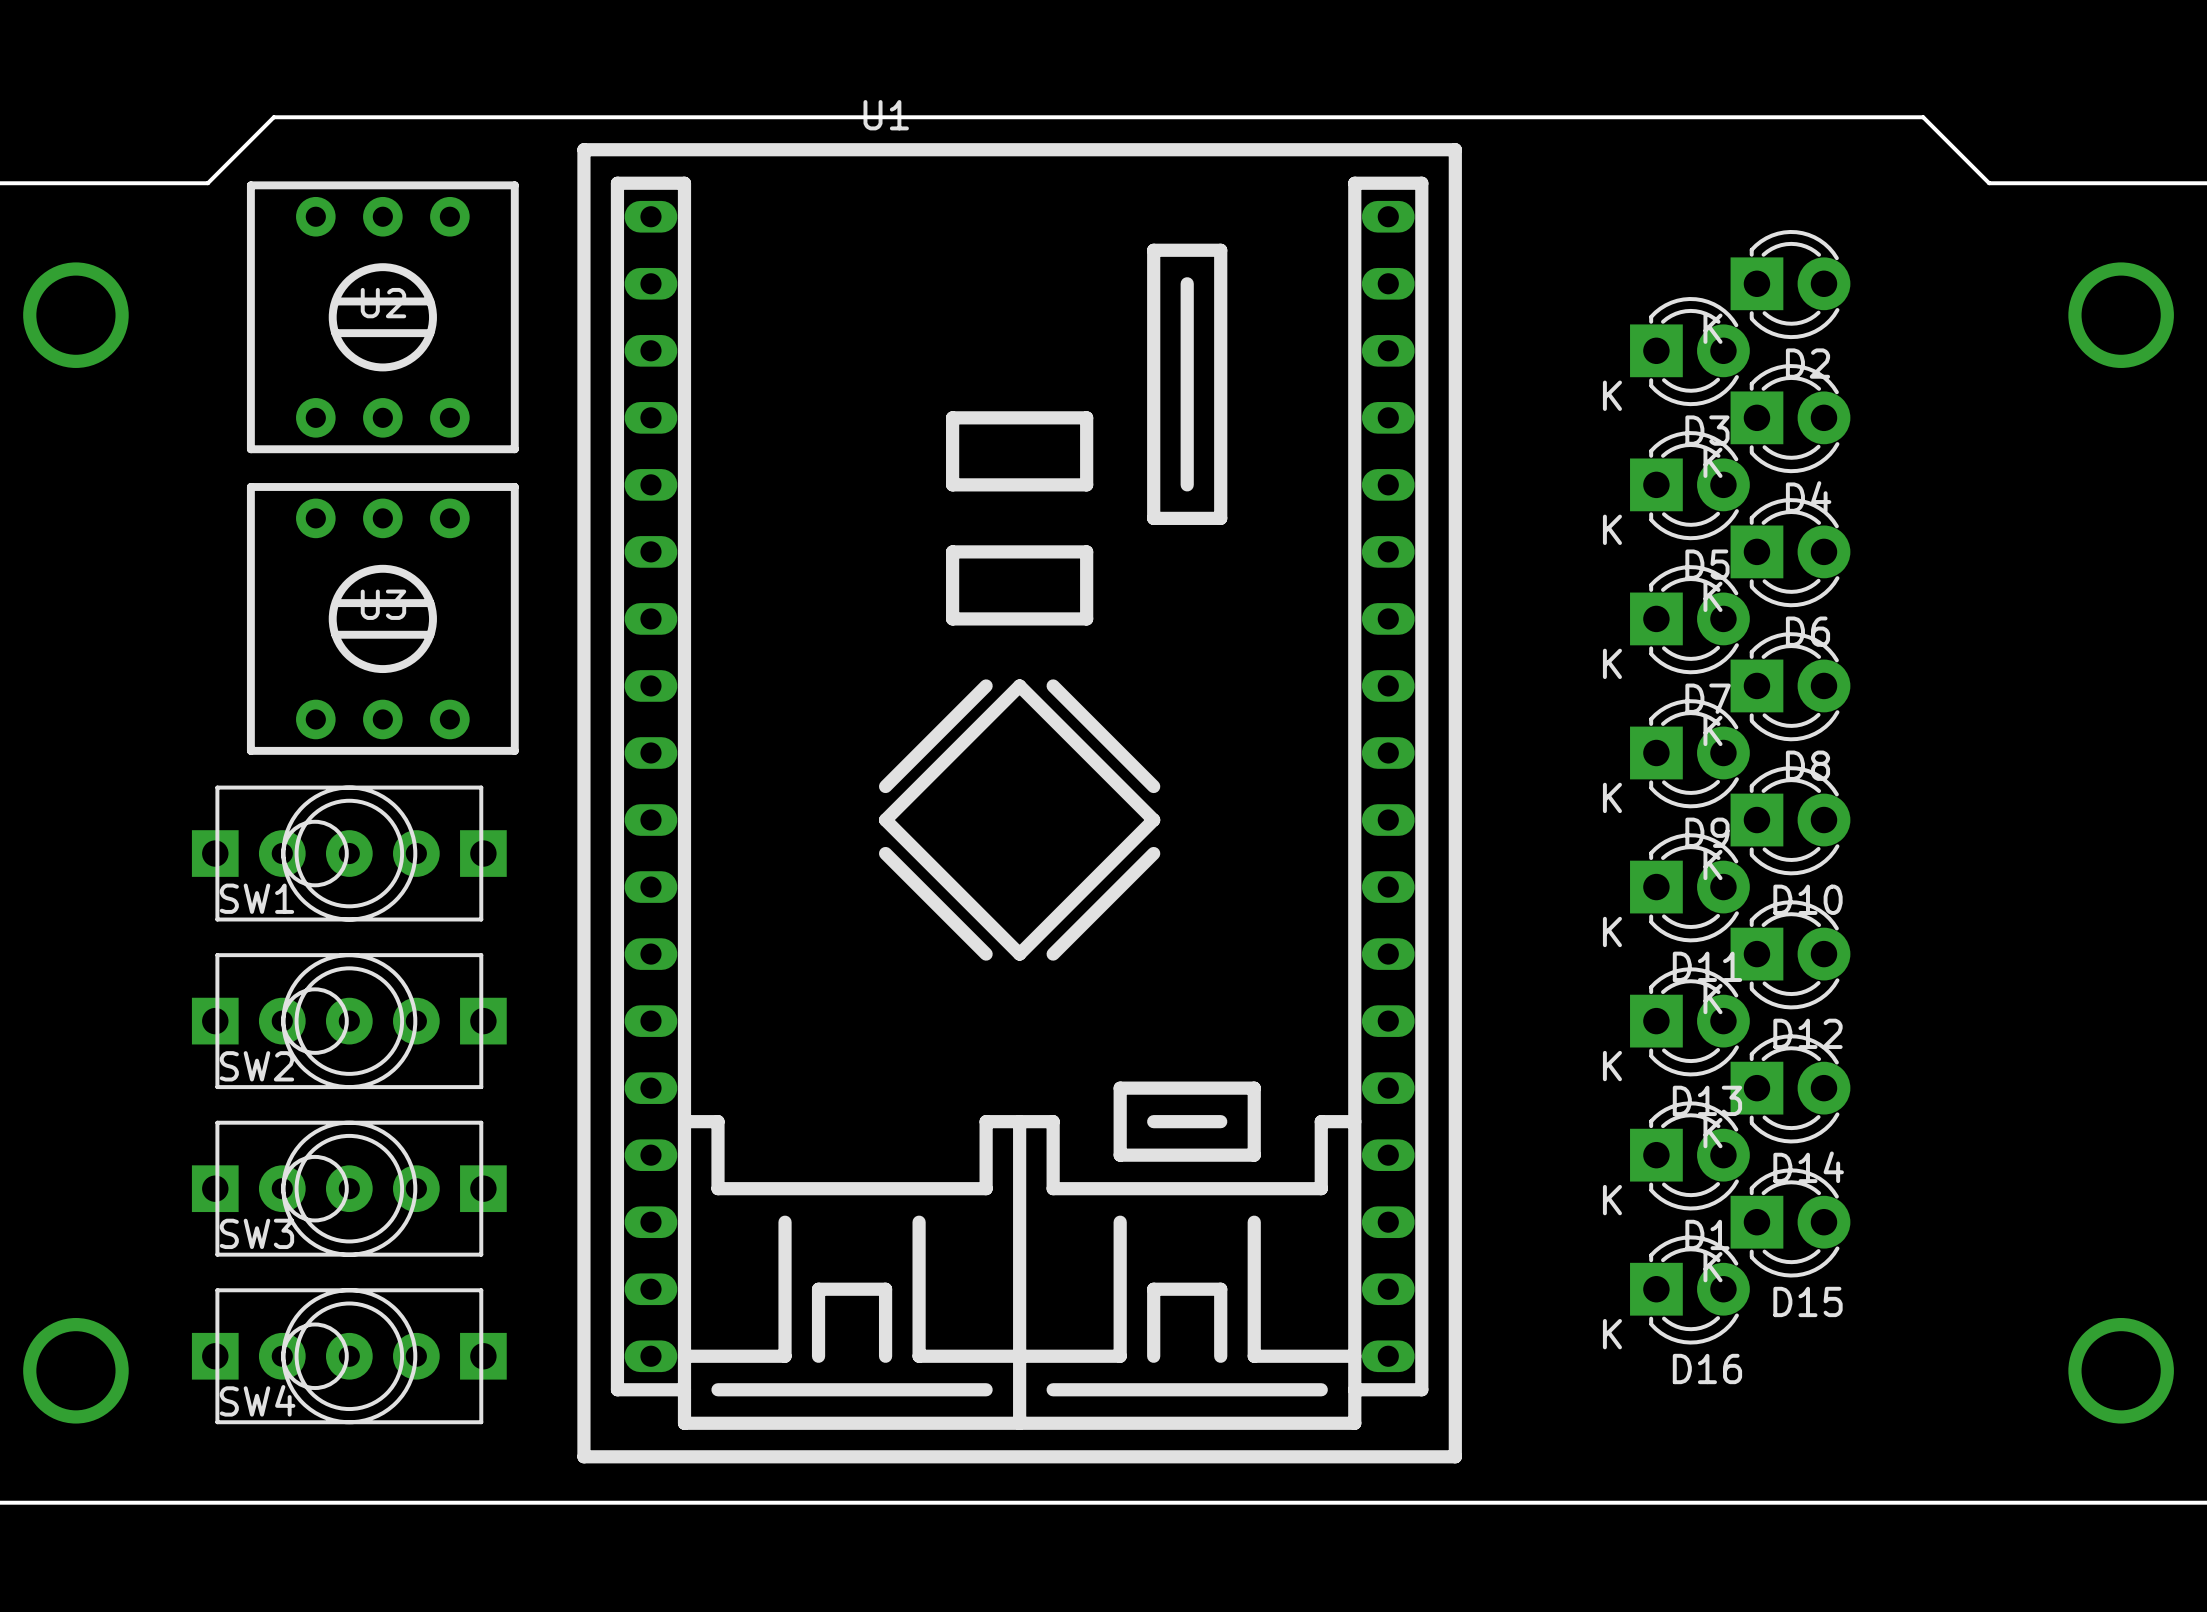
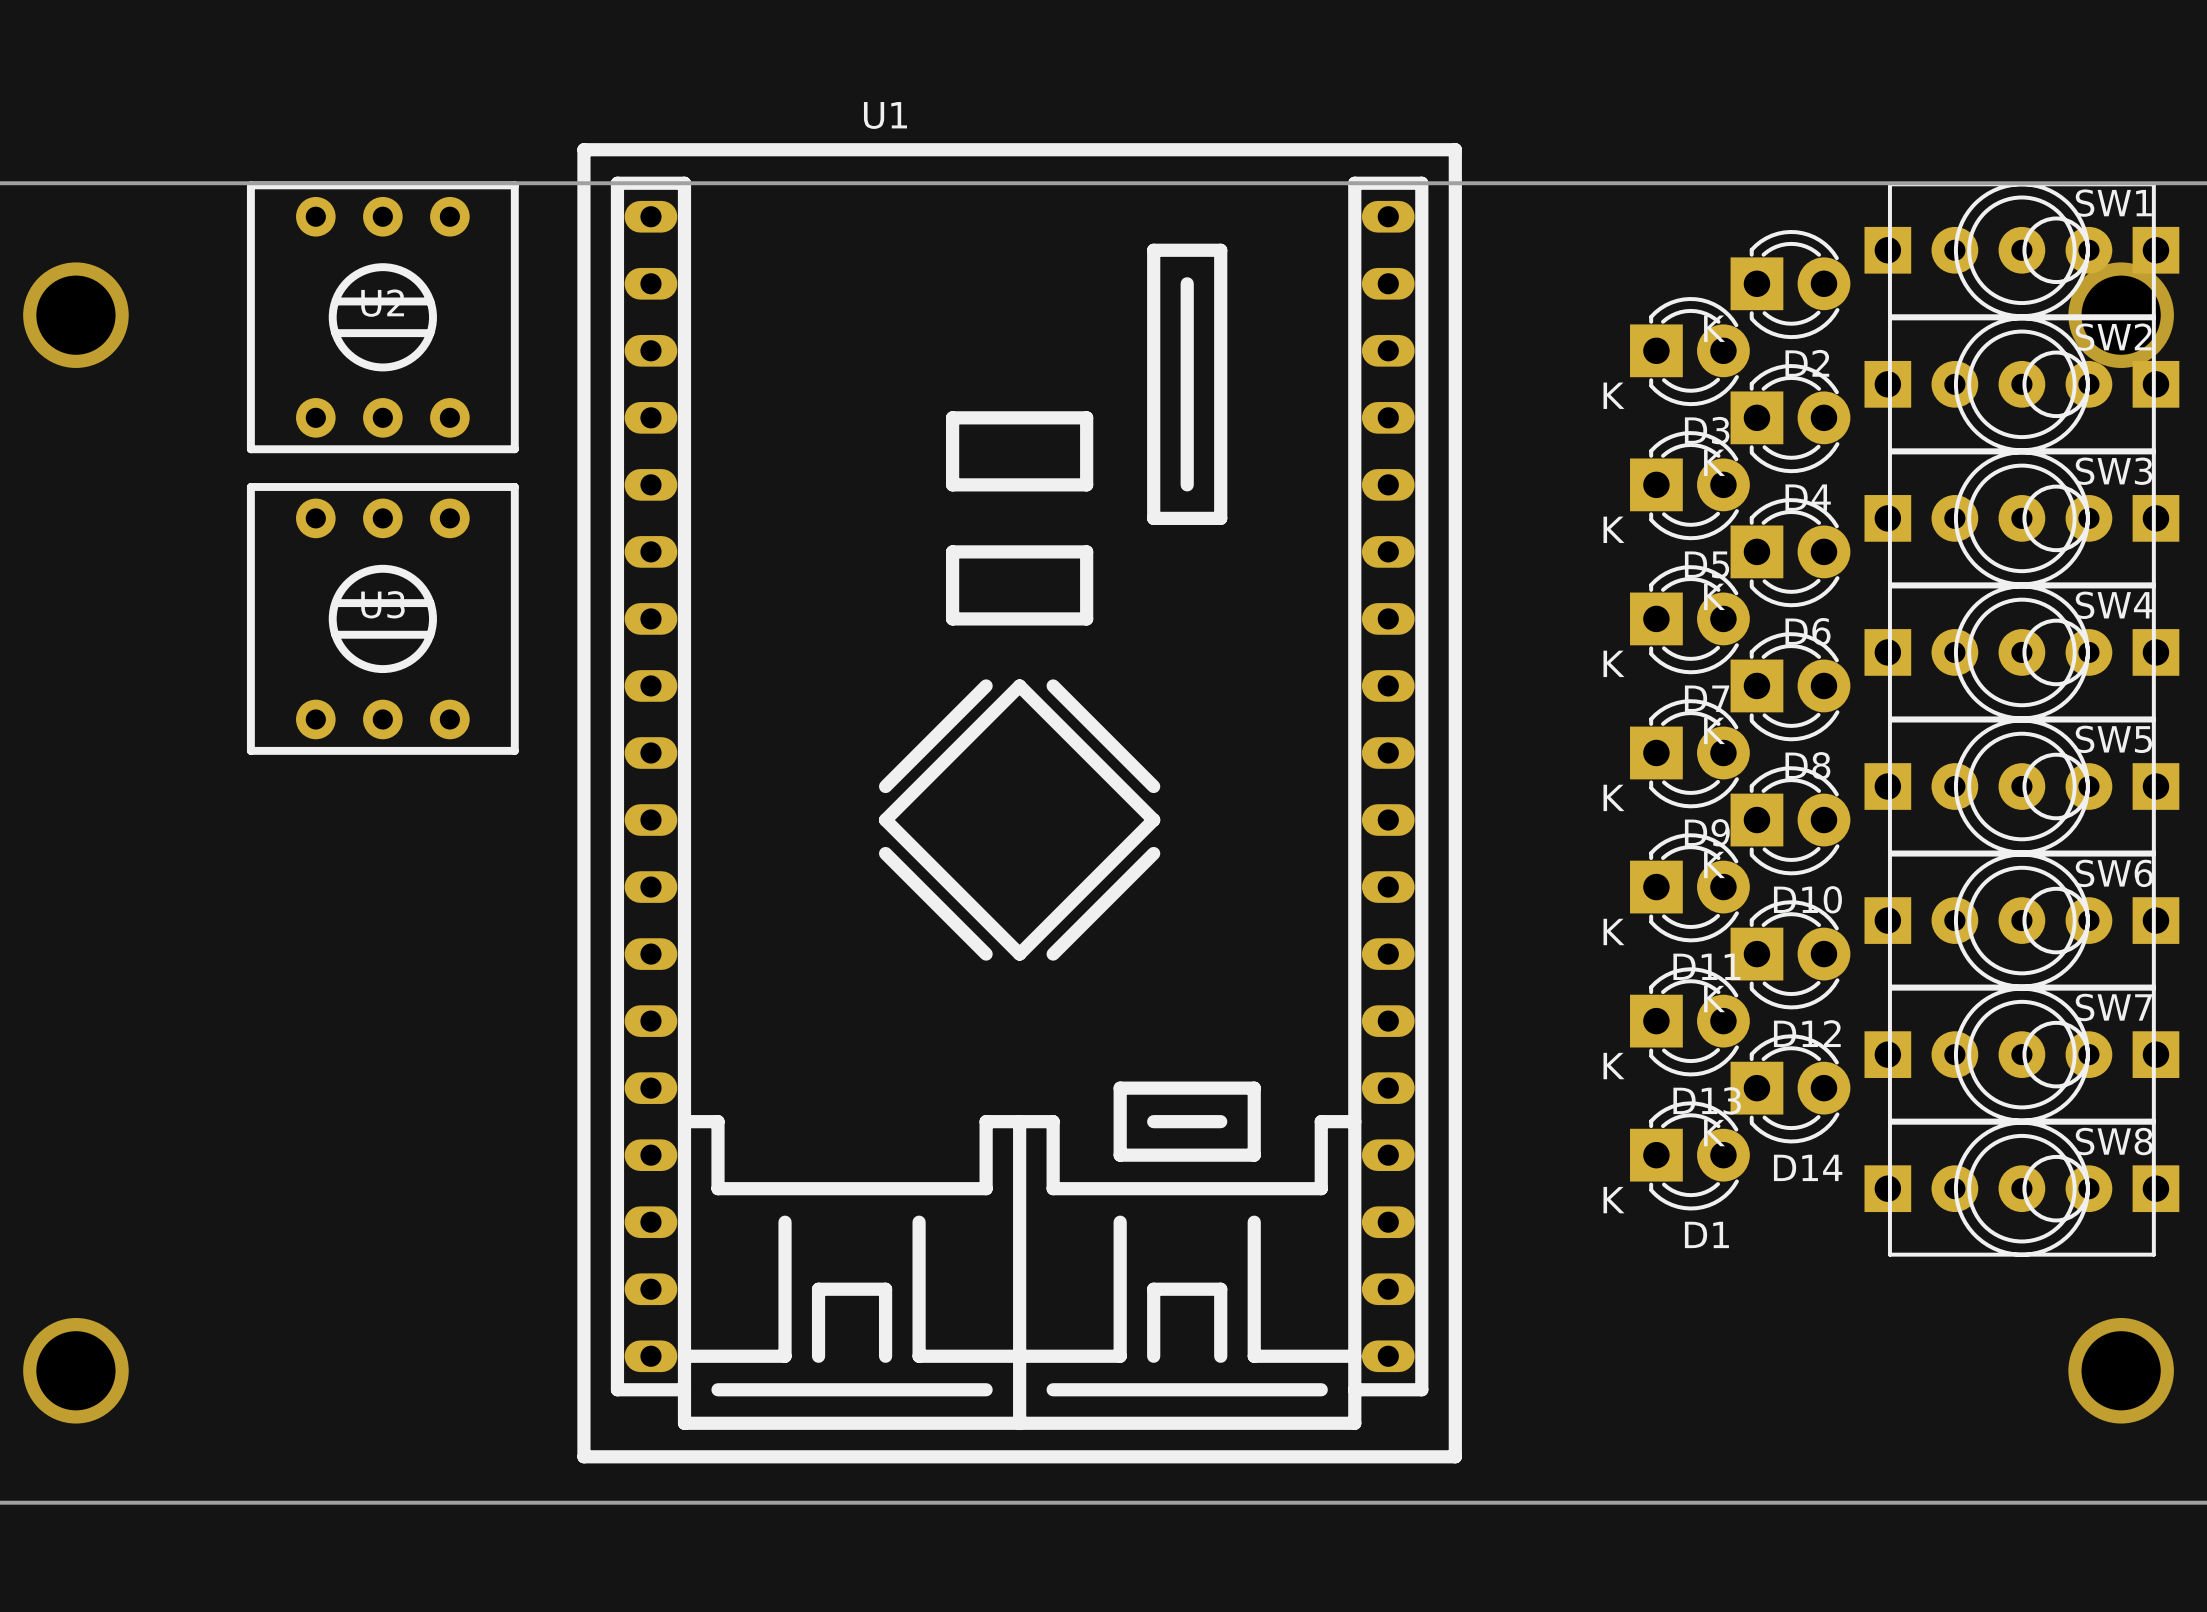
board edge: (207, 183) (273, 117) (1923, 117) (1989, 183) -> (207, 183) (1989, 183)
SW5: none -> (2021, 786)
SW1 rotation: 0° (349, 853) -> 180° (2021, 250)
SW1 position: (349, 853) -> (2021, 250)
SW6: none -> (2021, 920)
SW2 rotation: 0° (349, 1021) -> 180° (2021, 384)
SW2 position: (349, 1021) -> (2021, 384)
SW7: none -> (2021, 1054)
SW3 rotation: 0° (349, 1188) -> 180° (2021, 518)
SW3 position: (349, 1188) -> (2021, 518)
SW8: none -> (2021, 1188)
D15: (1790, 1222) -> none
D16: (1689, 1289) -> none
SW4 rotation: 0° (349, 1356) -> 180° (2021, 652)
SW4 position: (349, 1356) -> (2021, 652)

